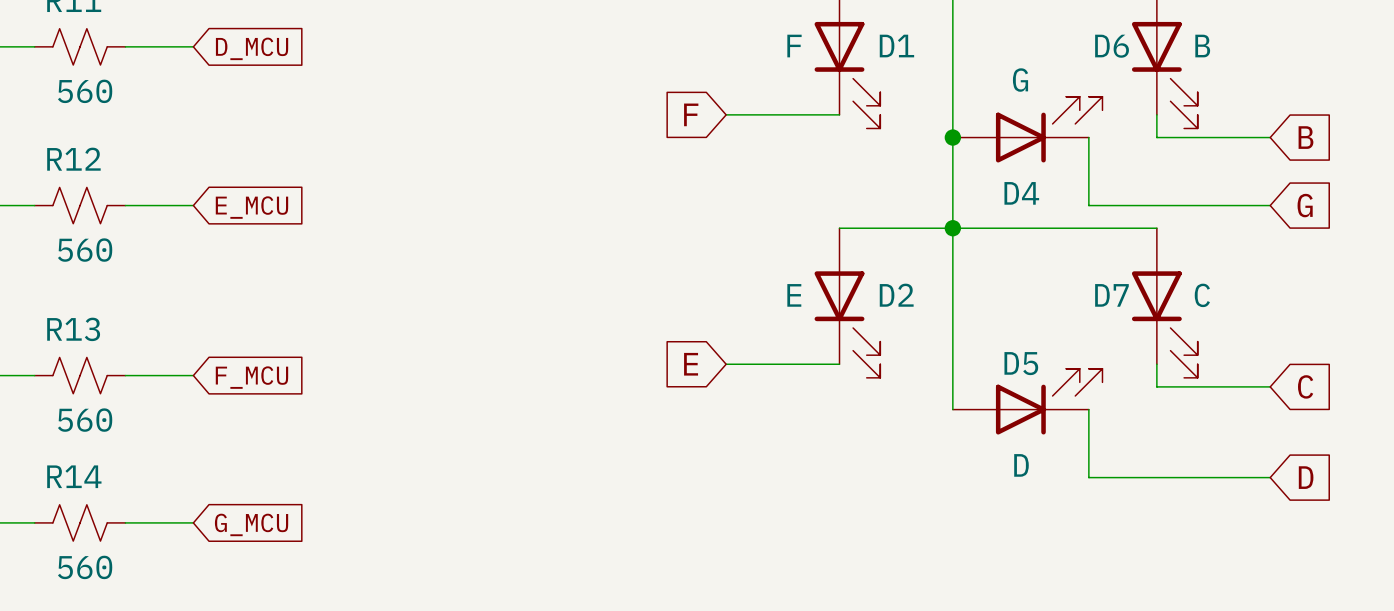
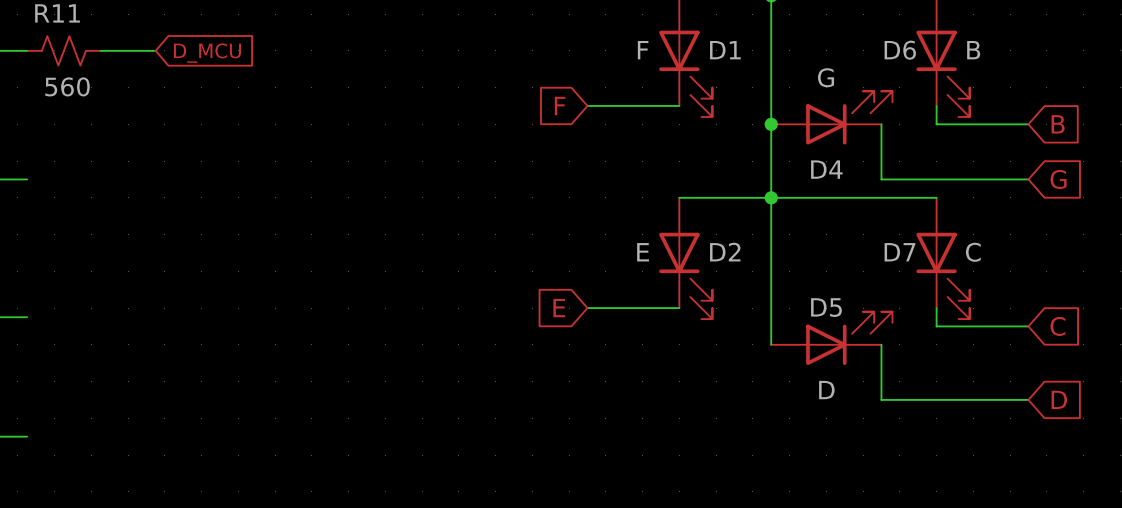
R12: 560 (80, 205) -> none
wire: (125, 205) (193, 205) -> none
global label: E_MCU (251, 207) -> none
R13: 560 (80, 375) -> none
wire: (125, 375) (193, 375) -> none
global label: F_MCU (251, 377) -> none
R14: 560 (80, 522) -> none
wire: (125, 522) (193, 522) -> none
global label: G_MCU (251, 524) -> none

